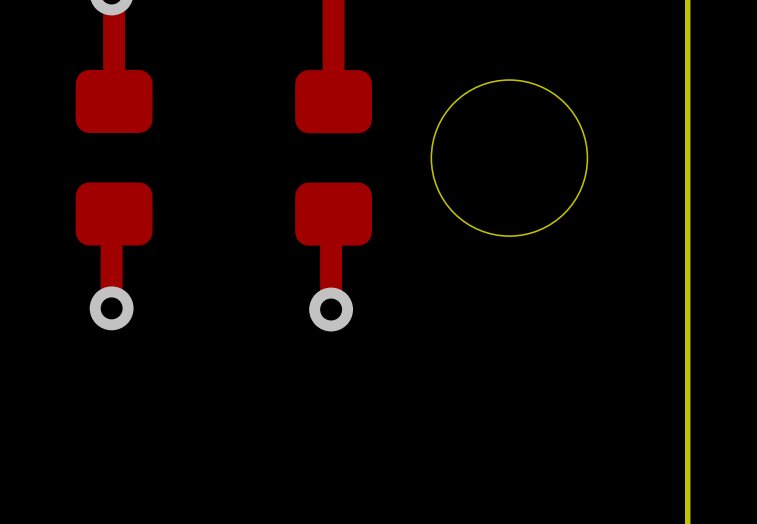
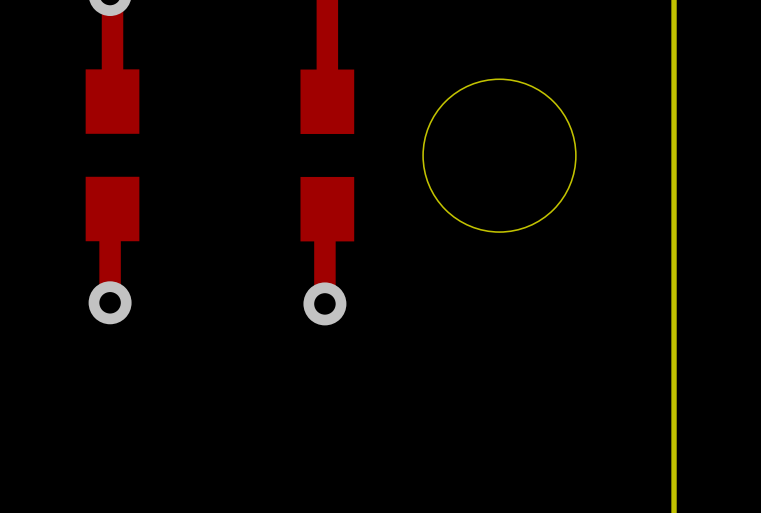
part footprint: [75, 69, 153, 246] -> [85, 69, 140, 242]
part footprint: [295, 70, 372, 246] -> [300, 69, 355, 242]

